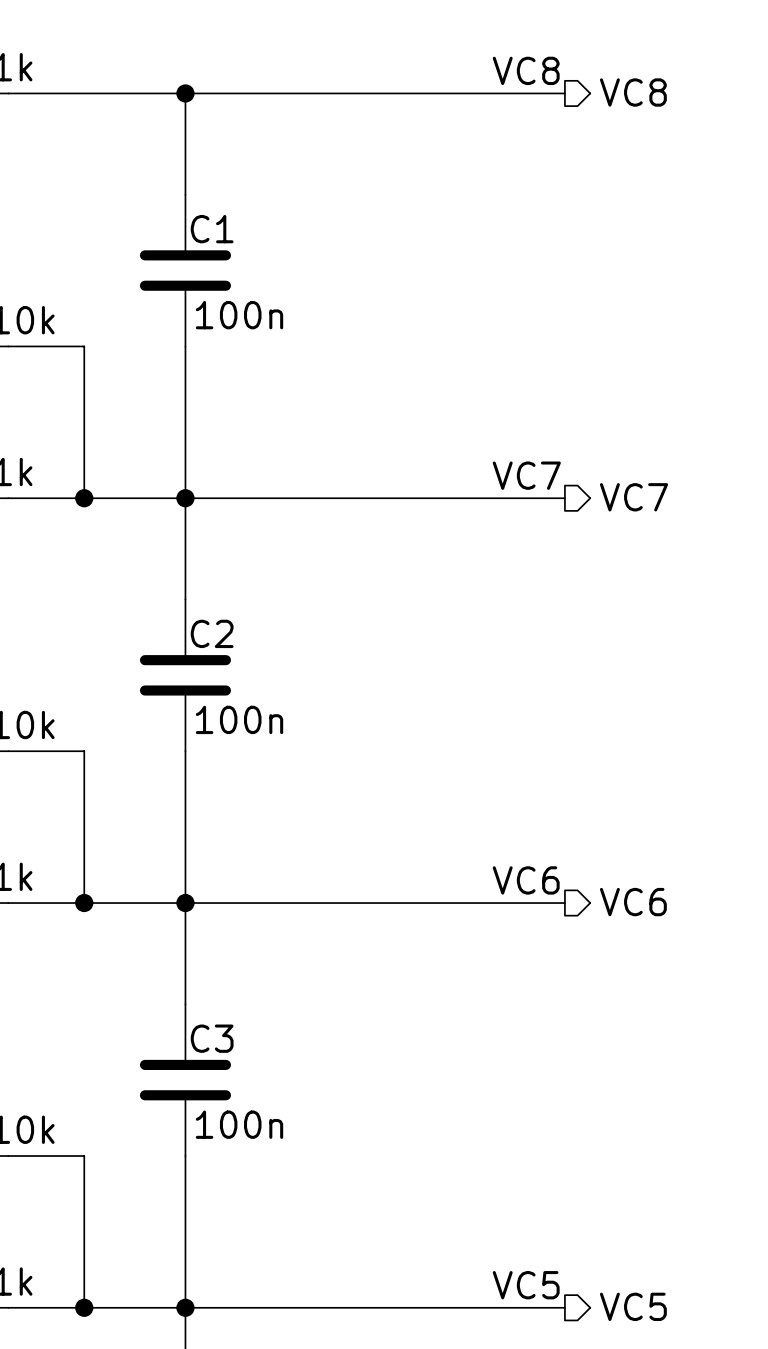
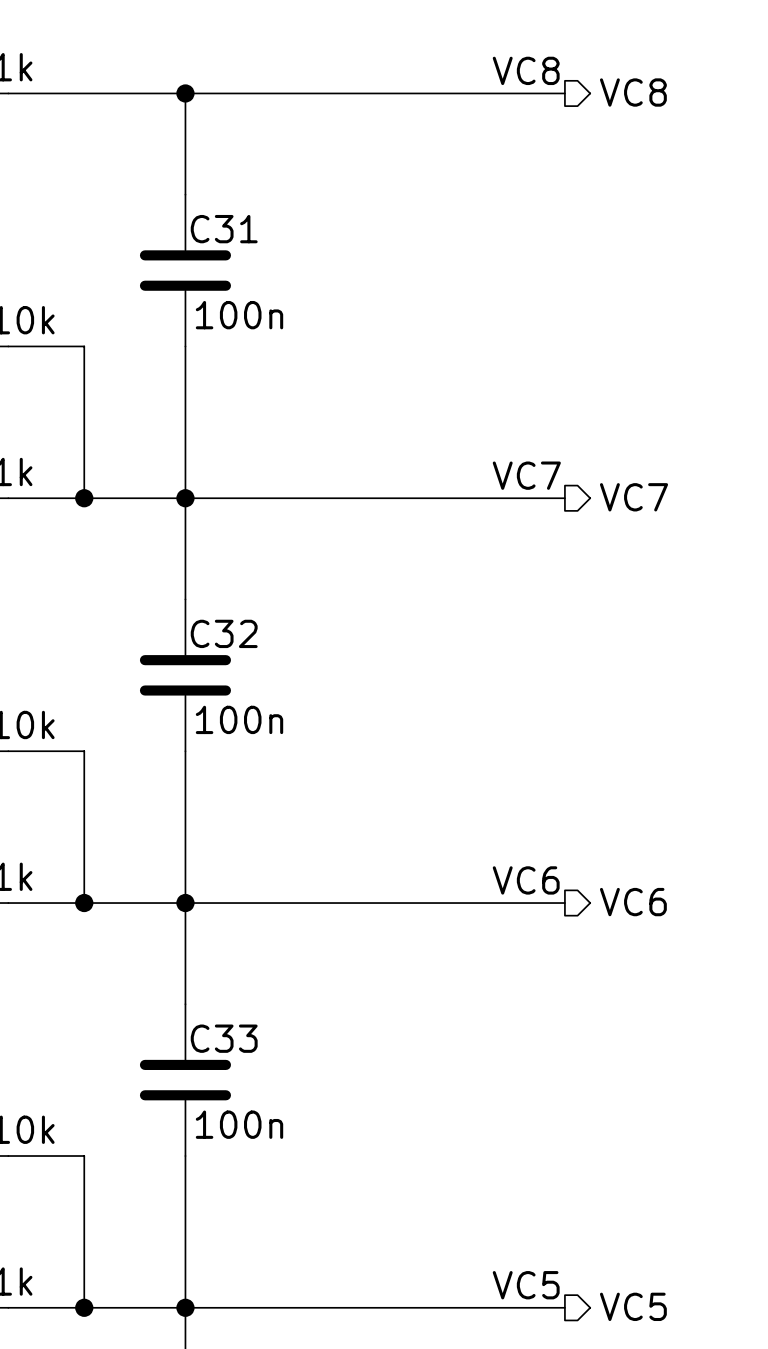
C1 name: C1 (212, 229) -> C31 (224, 229)
C2 name: C2 (212, 633) -> C32 (224, 633)
C3 name: C3 (212, 1038) -> C33 (224, 1038)

